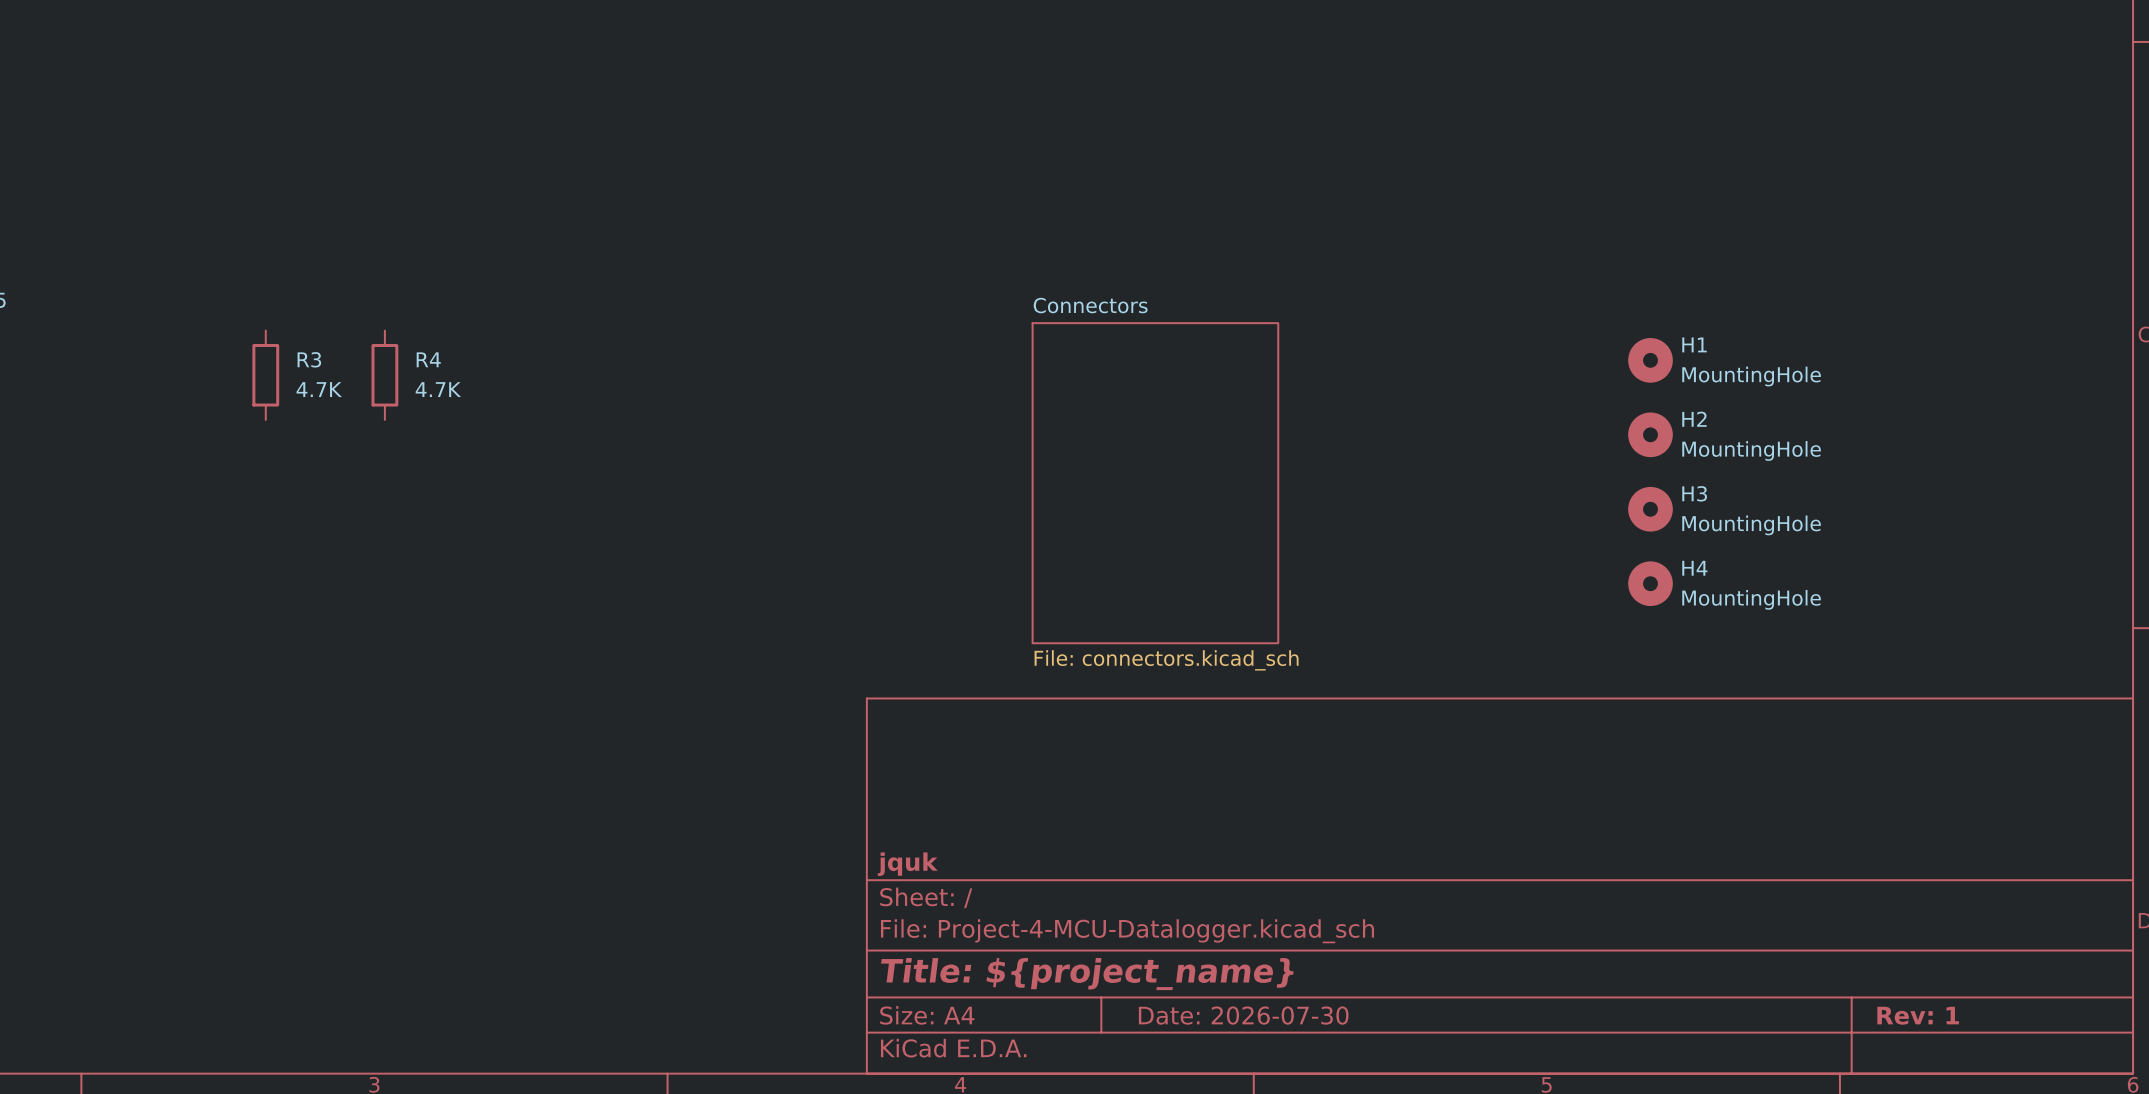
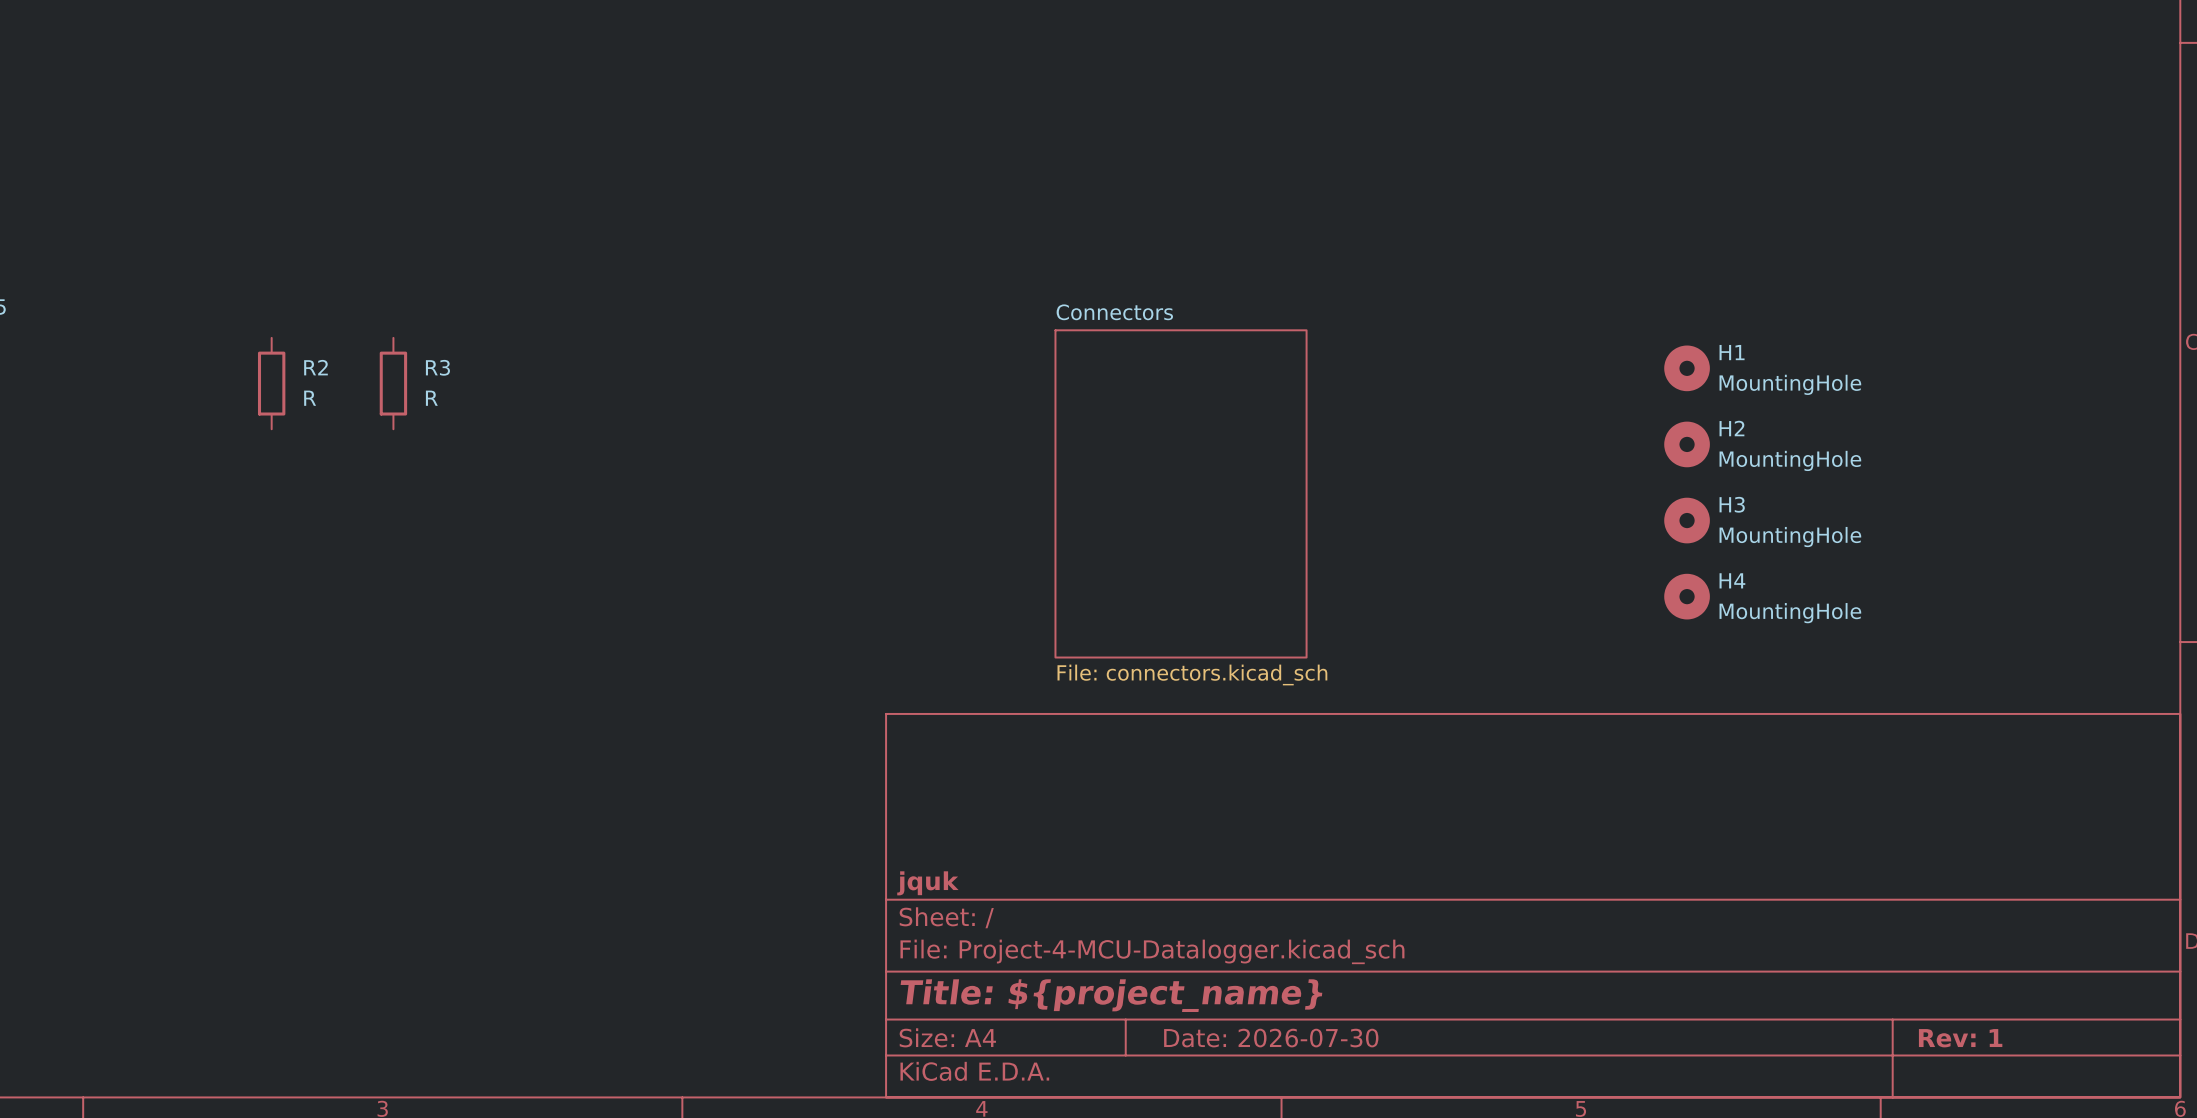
R3 name: R3 (309, 359) -> R2 (315, 367)
R4 name: R4 (428, 359) -> R3 (437, 367)
R3 value: 4.7K (319, 389) -> R (310, 398)
R4 value: 4.7K (438, 389) -> R (431, 398)

